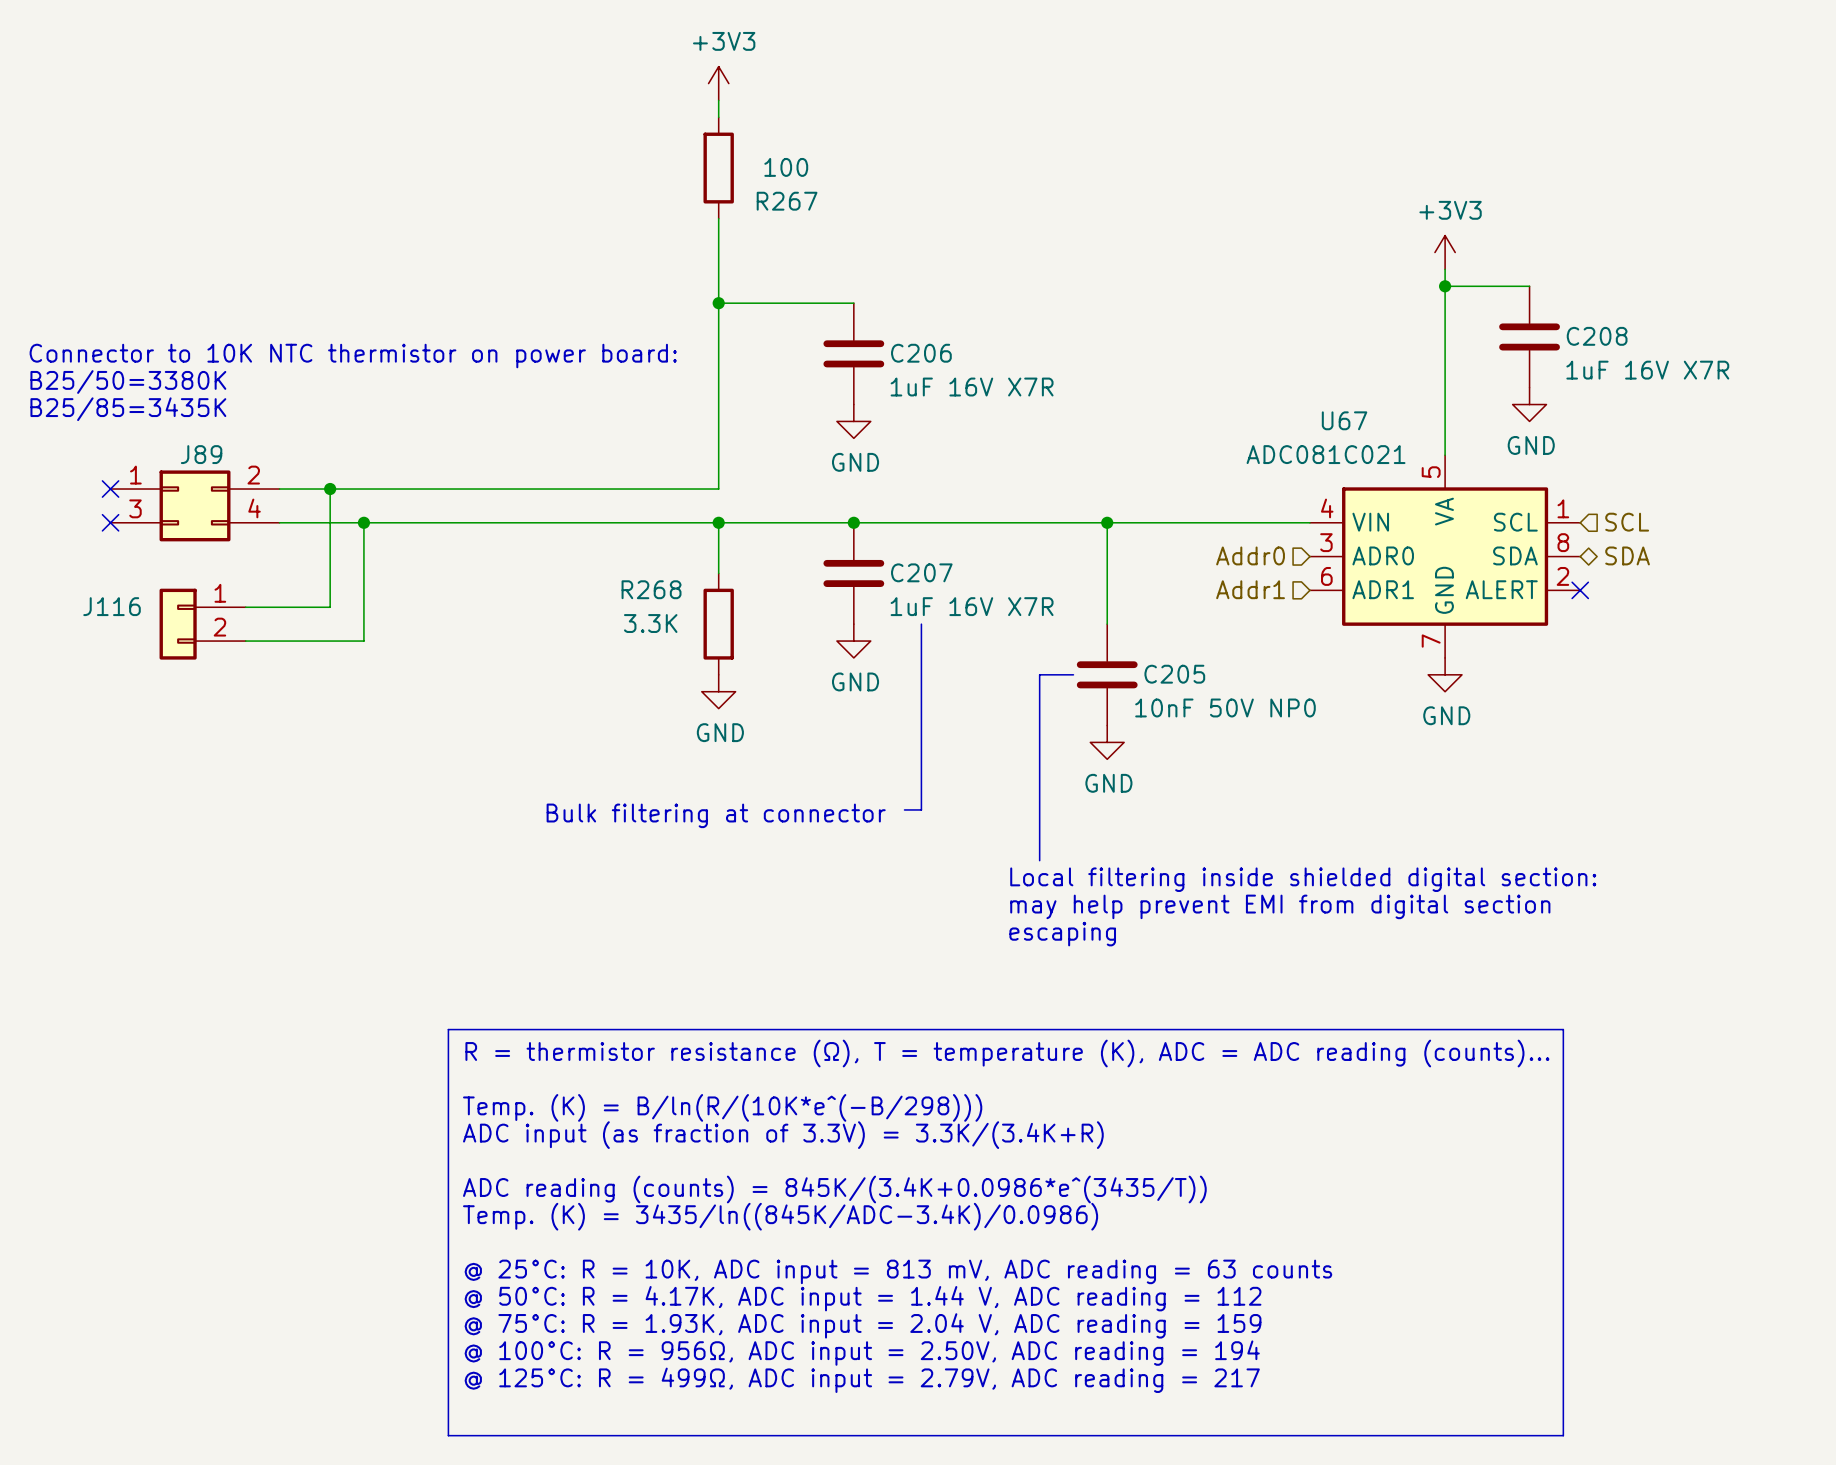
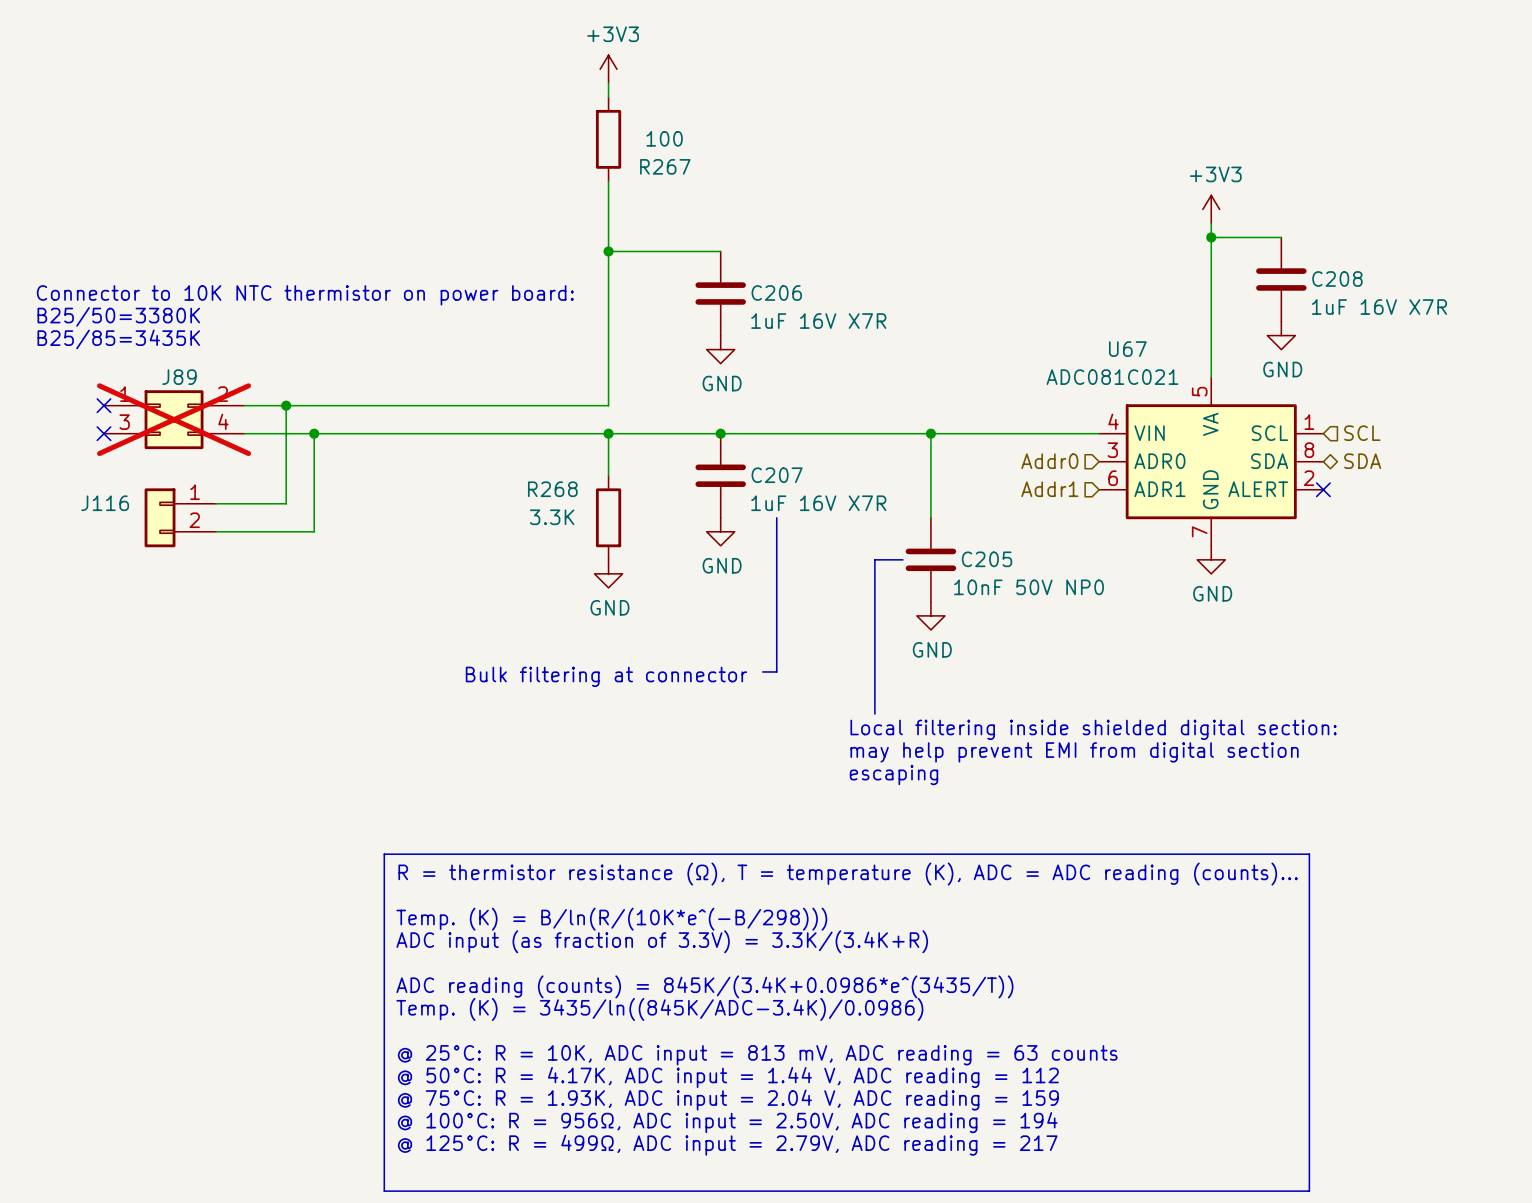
J89 do-not-place cross: none -> (174, 419)

